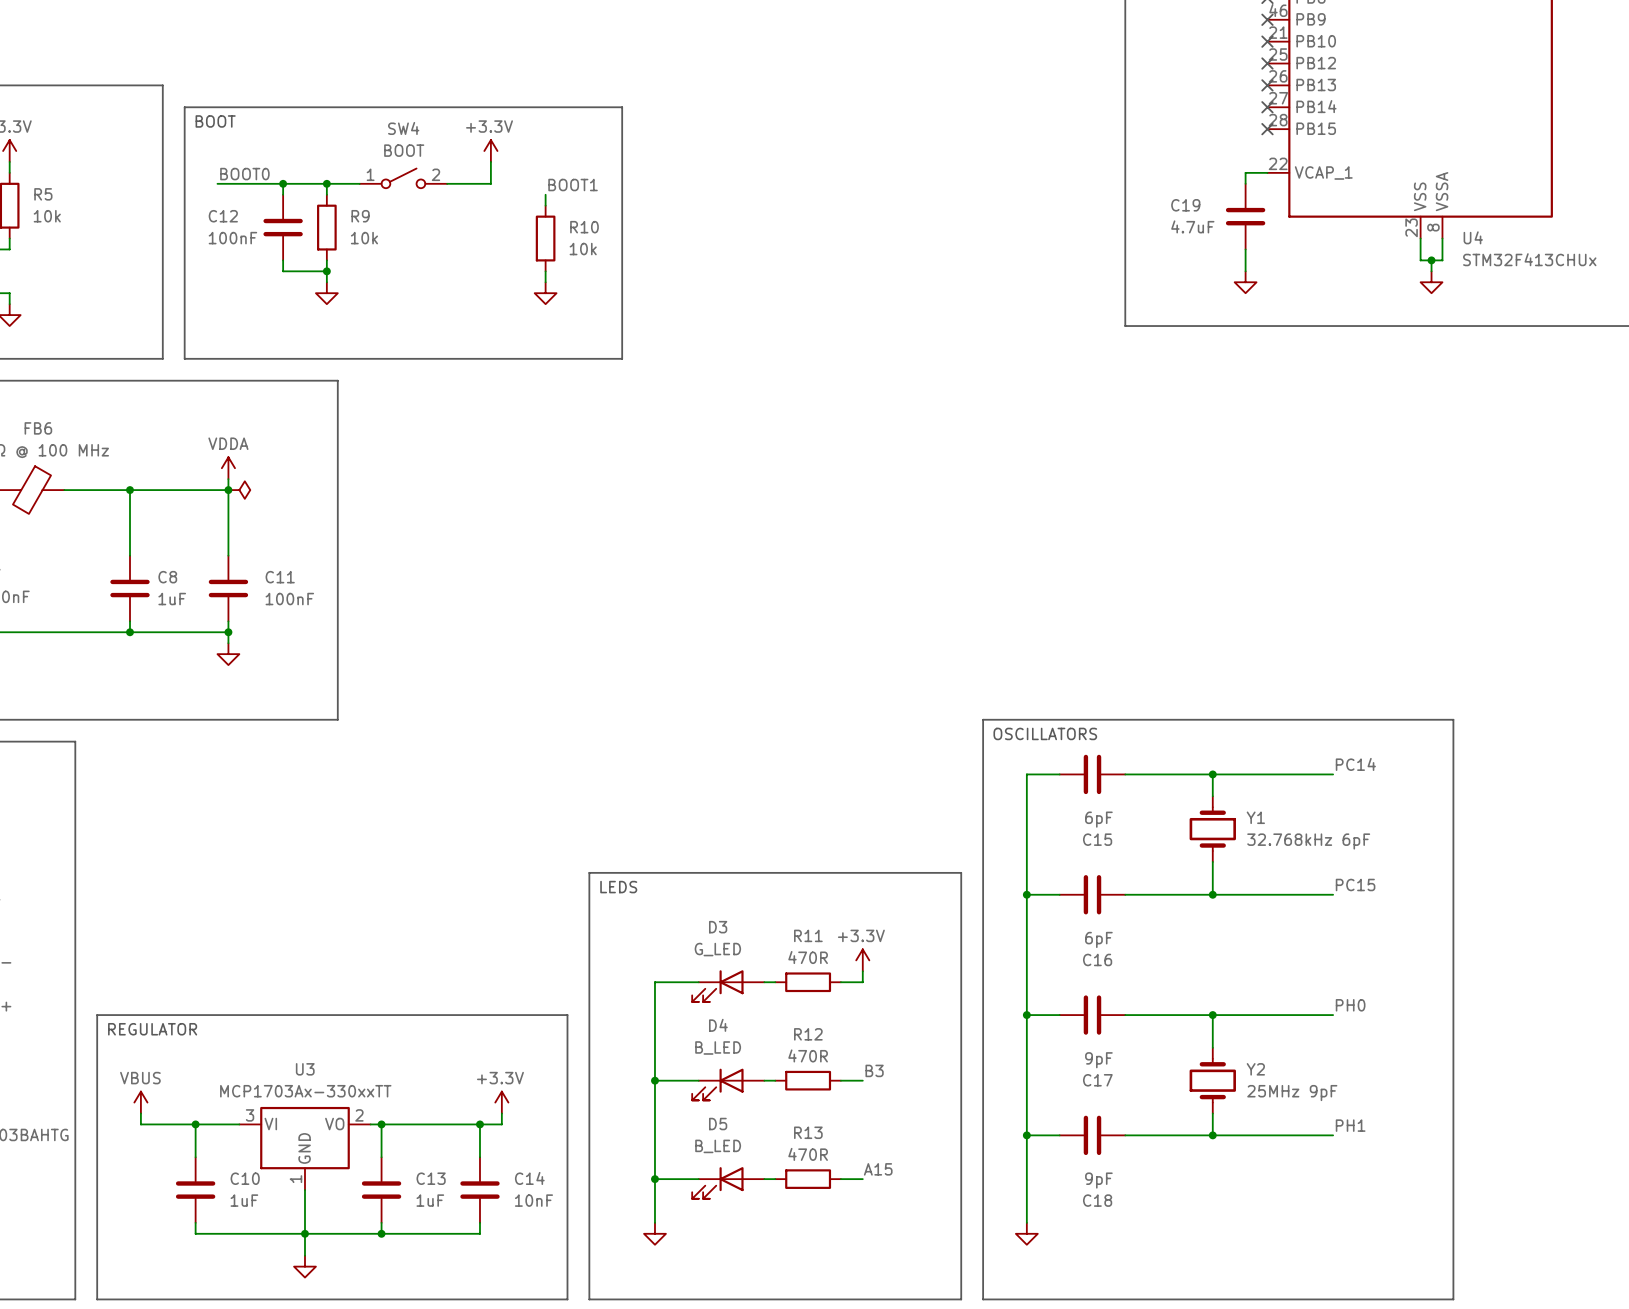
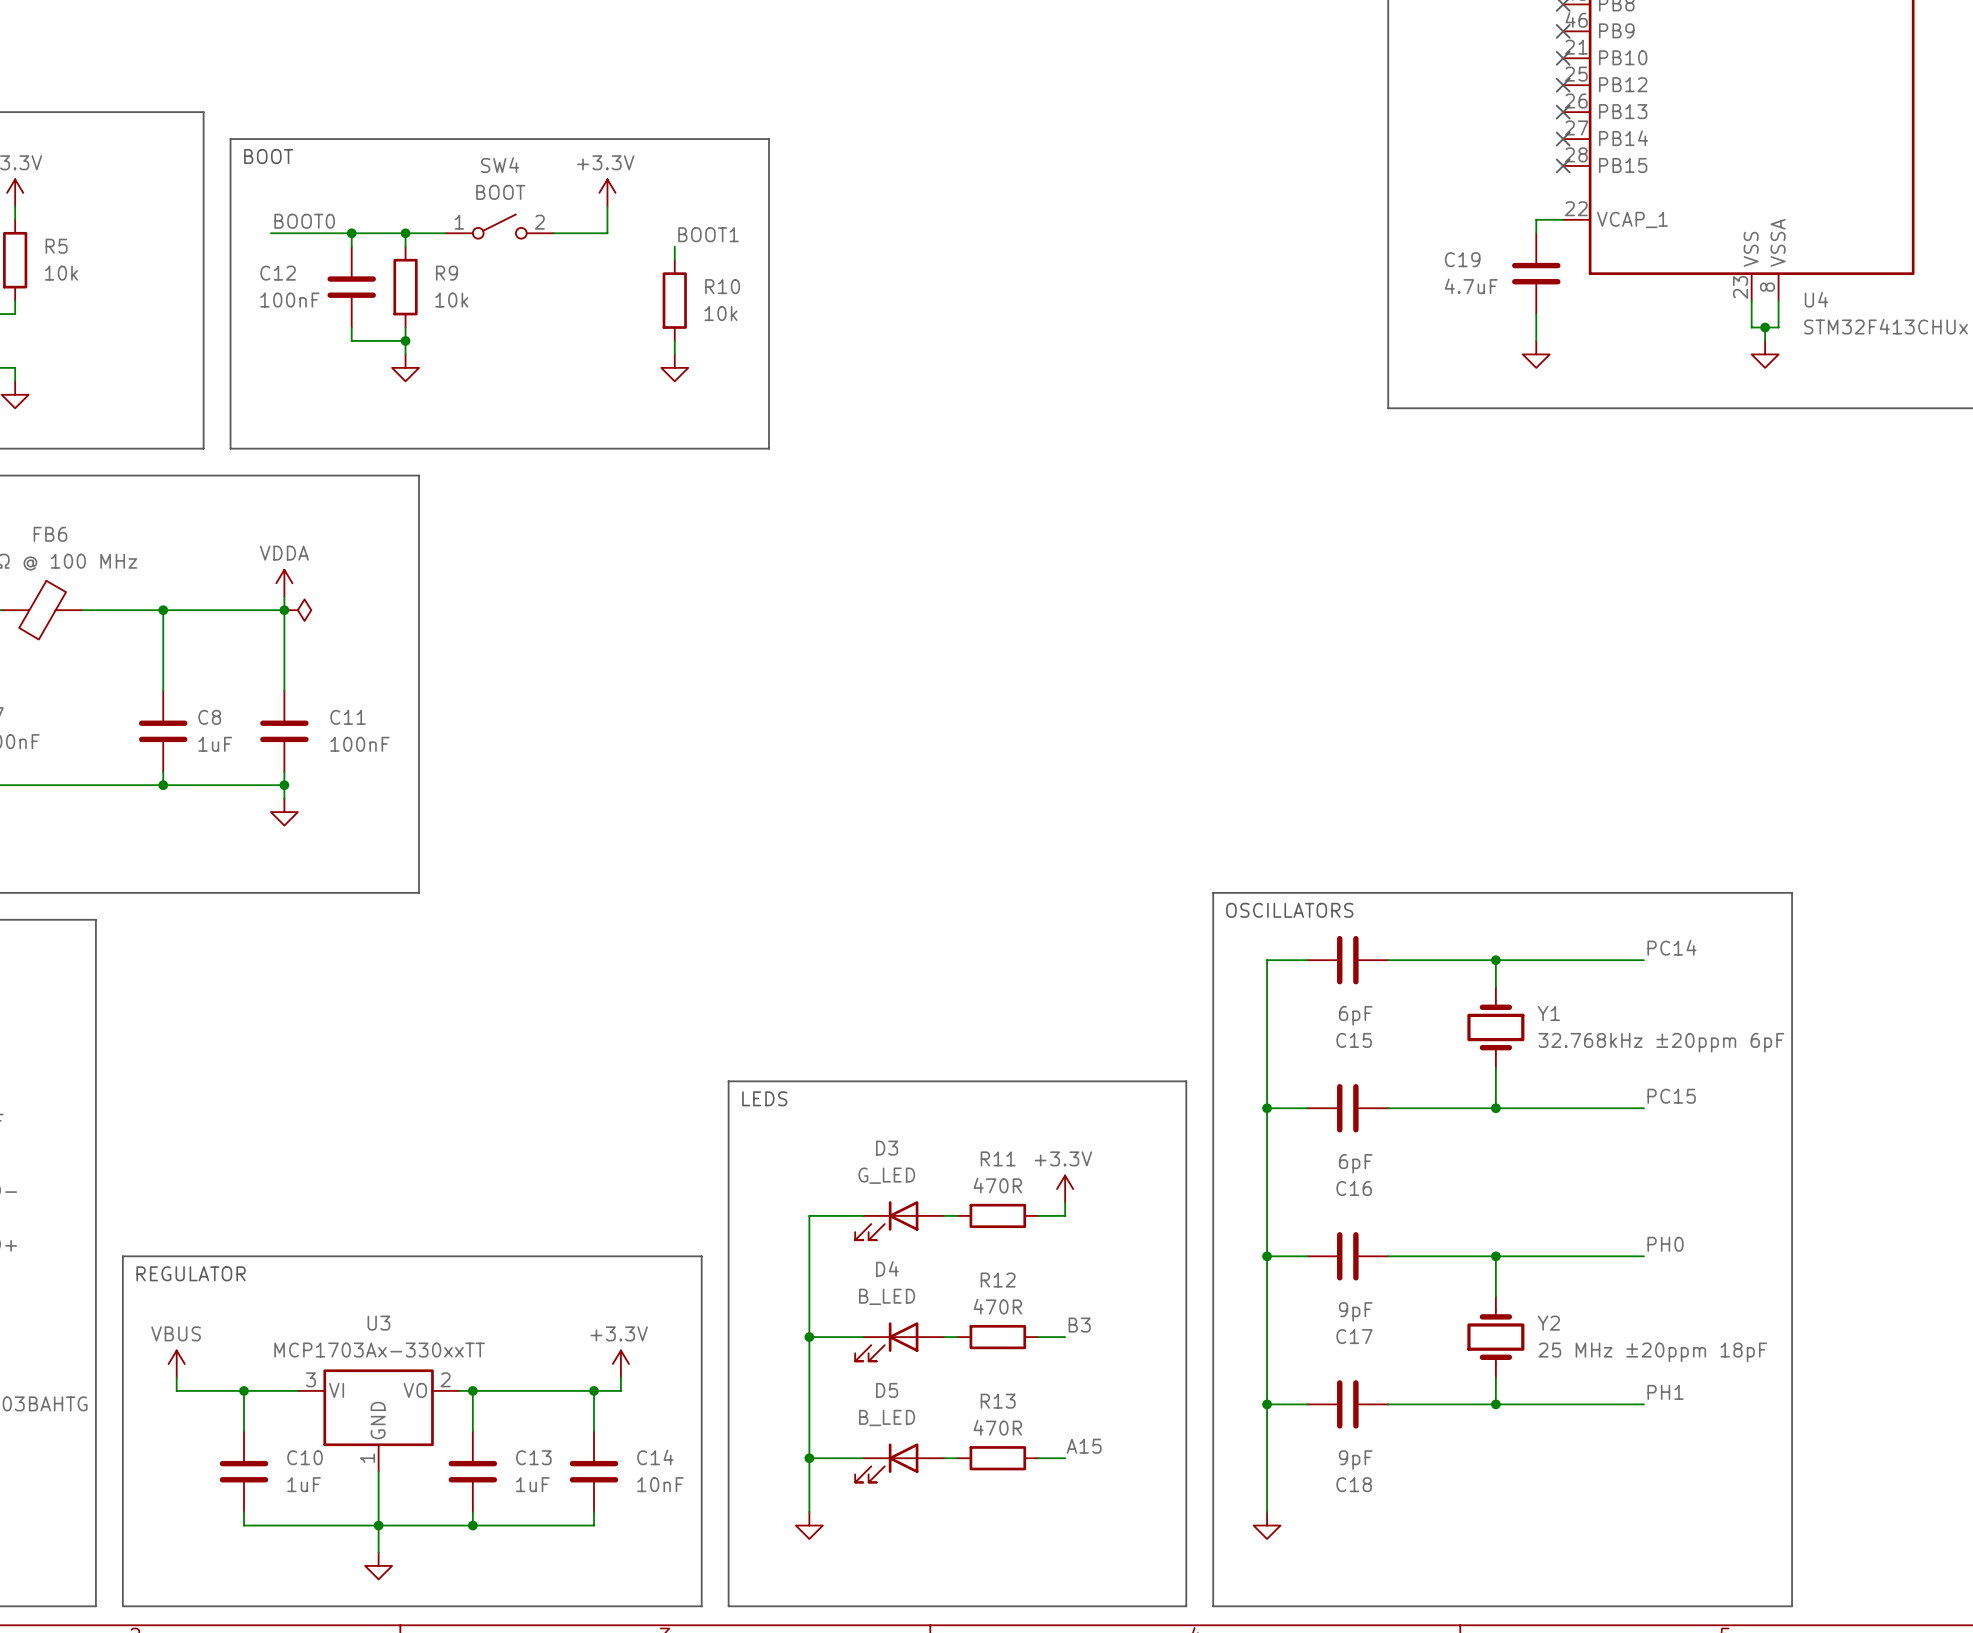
Y1 value: 32.768kHz 6pF (1308, 841) -> 32.768kHz ±20ppm 6pF (1661, 1042)
Y2 value: 25MHz 9pF (1292, 1093) -> 25 MHz ±20ppm 18pF (1652, 1352)

